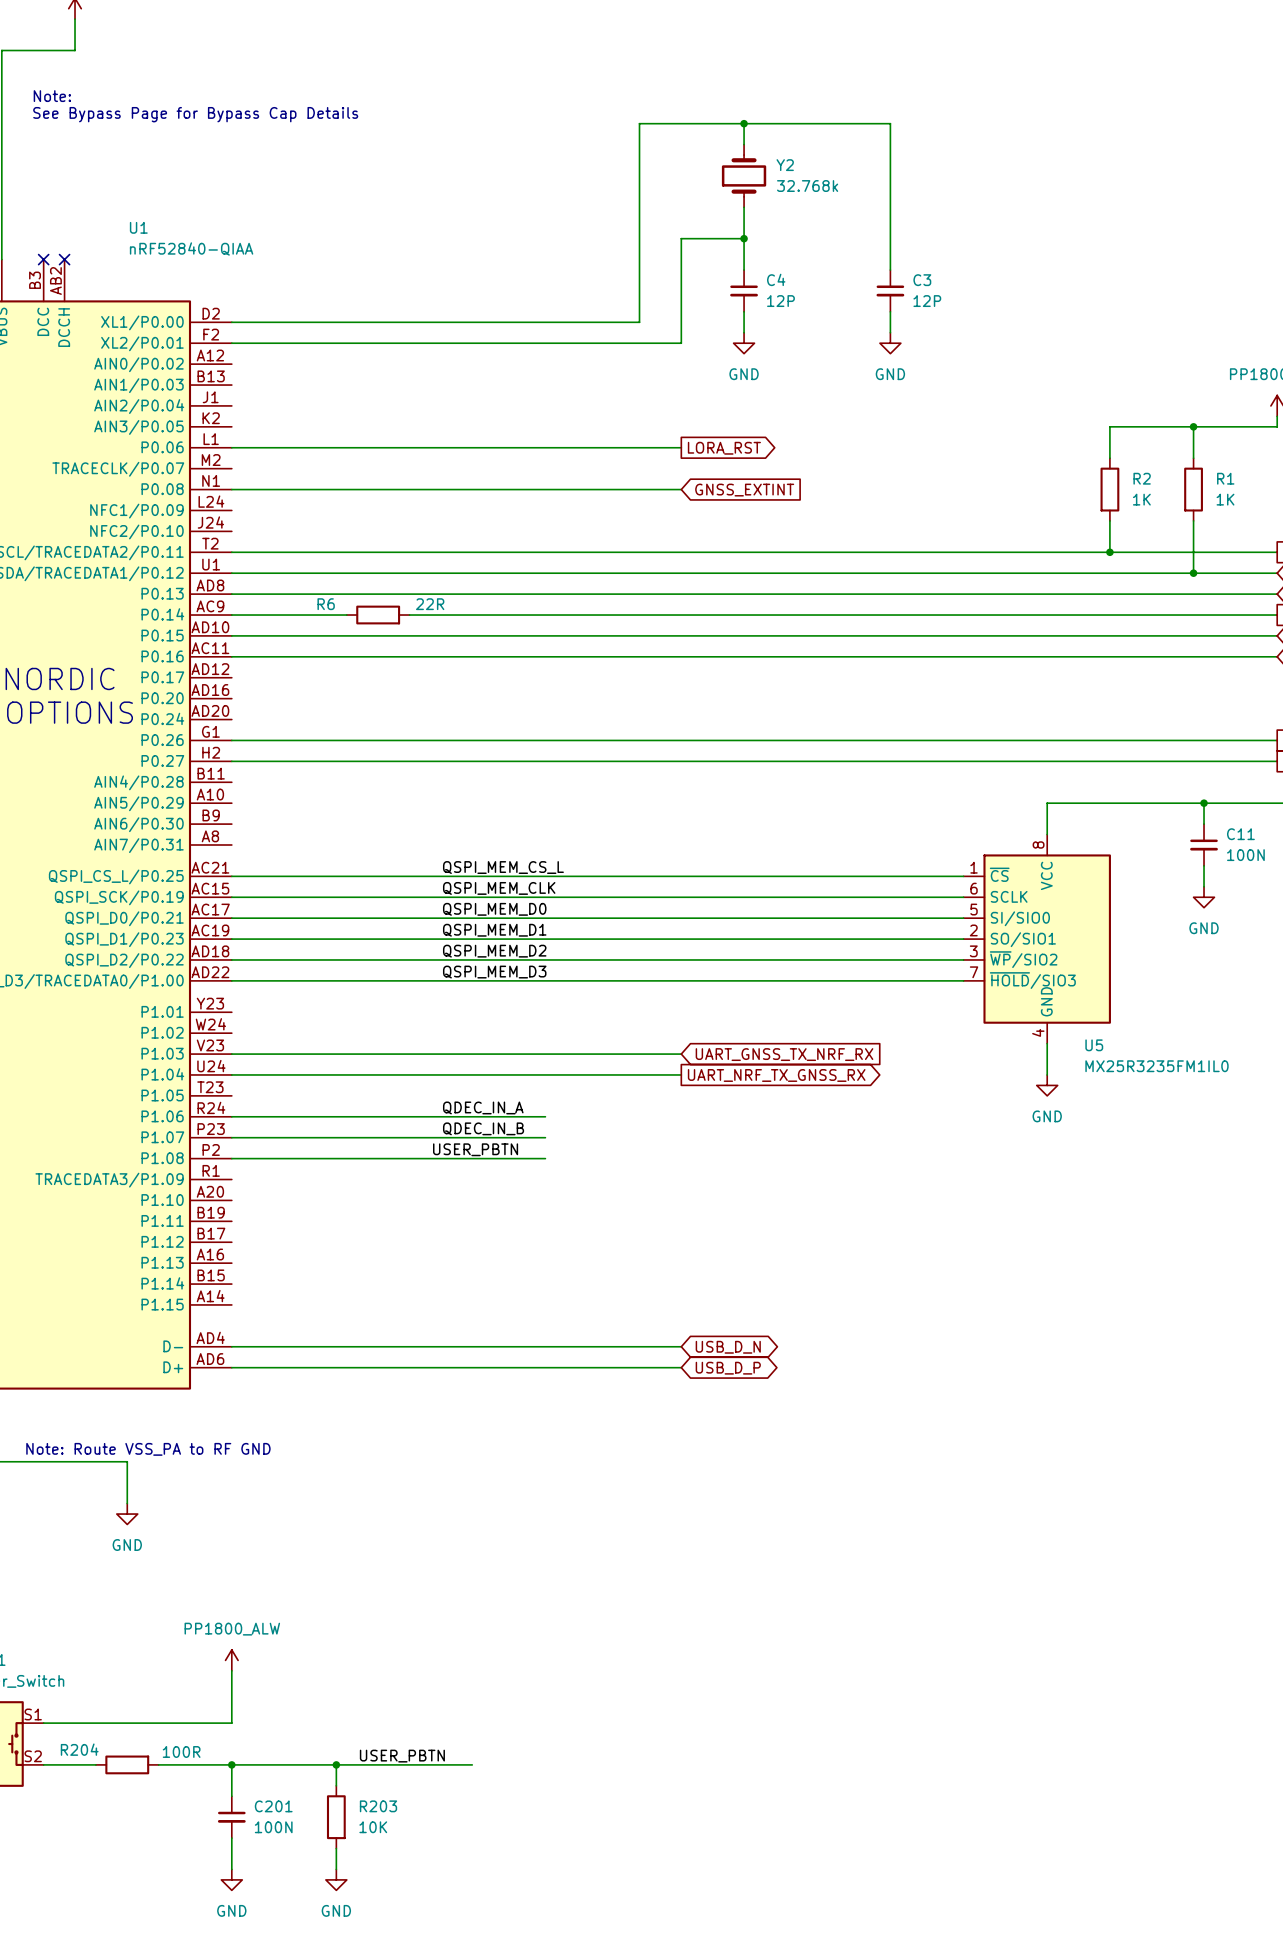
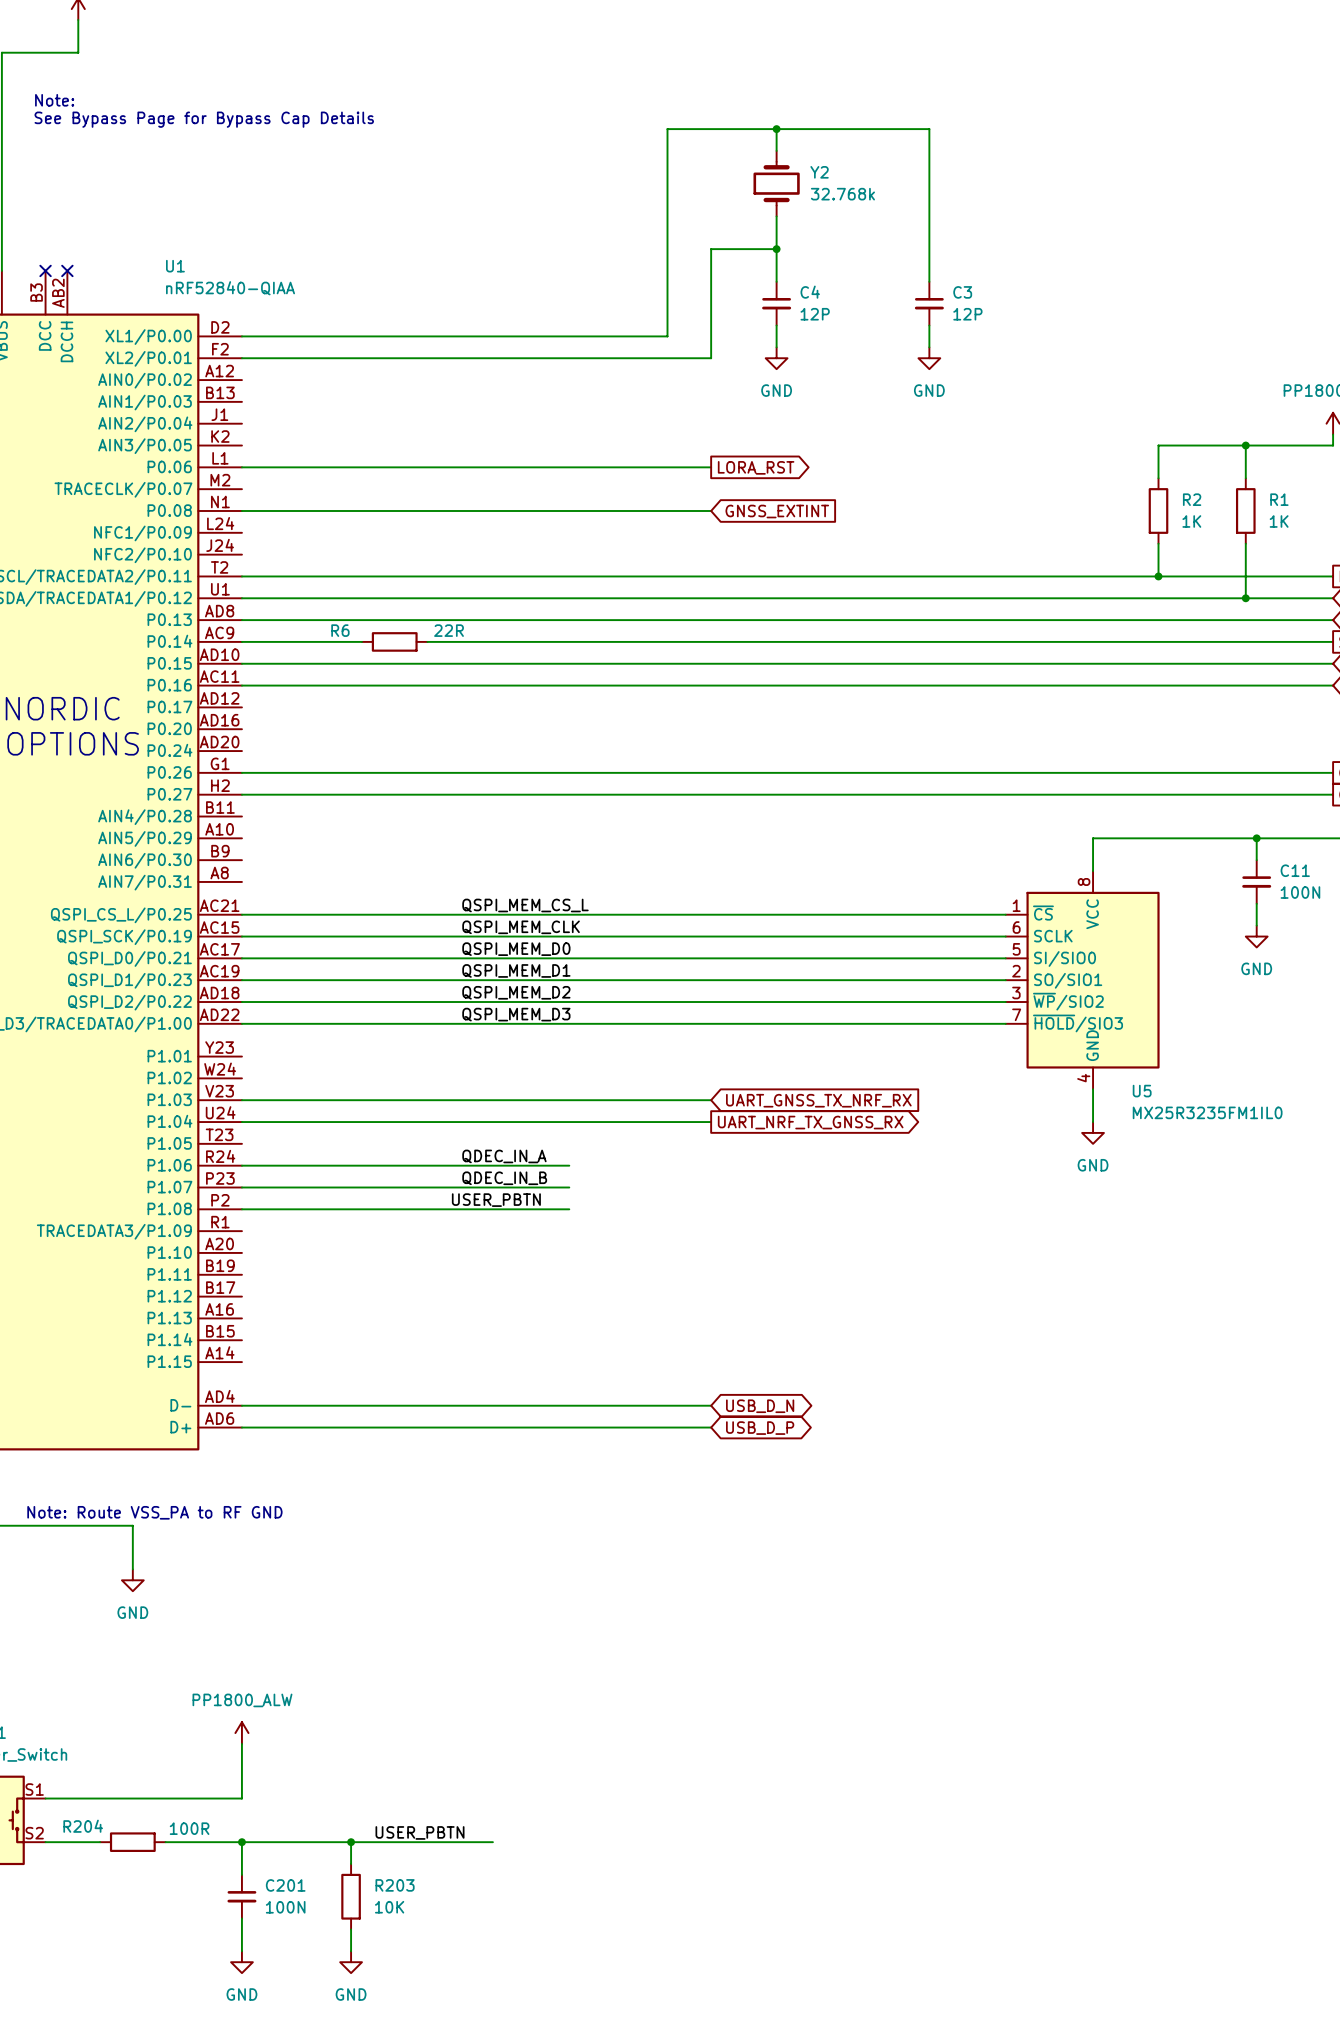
U1 name position: U1 (138, 227) -> U1 (175, 266)
U1 value position: nRF52840-QIAA (191, 248) -> nRF52840-QIAA (230, 288)

